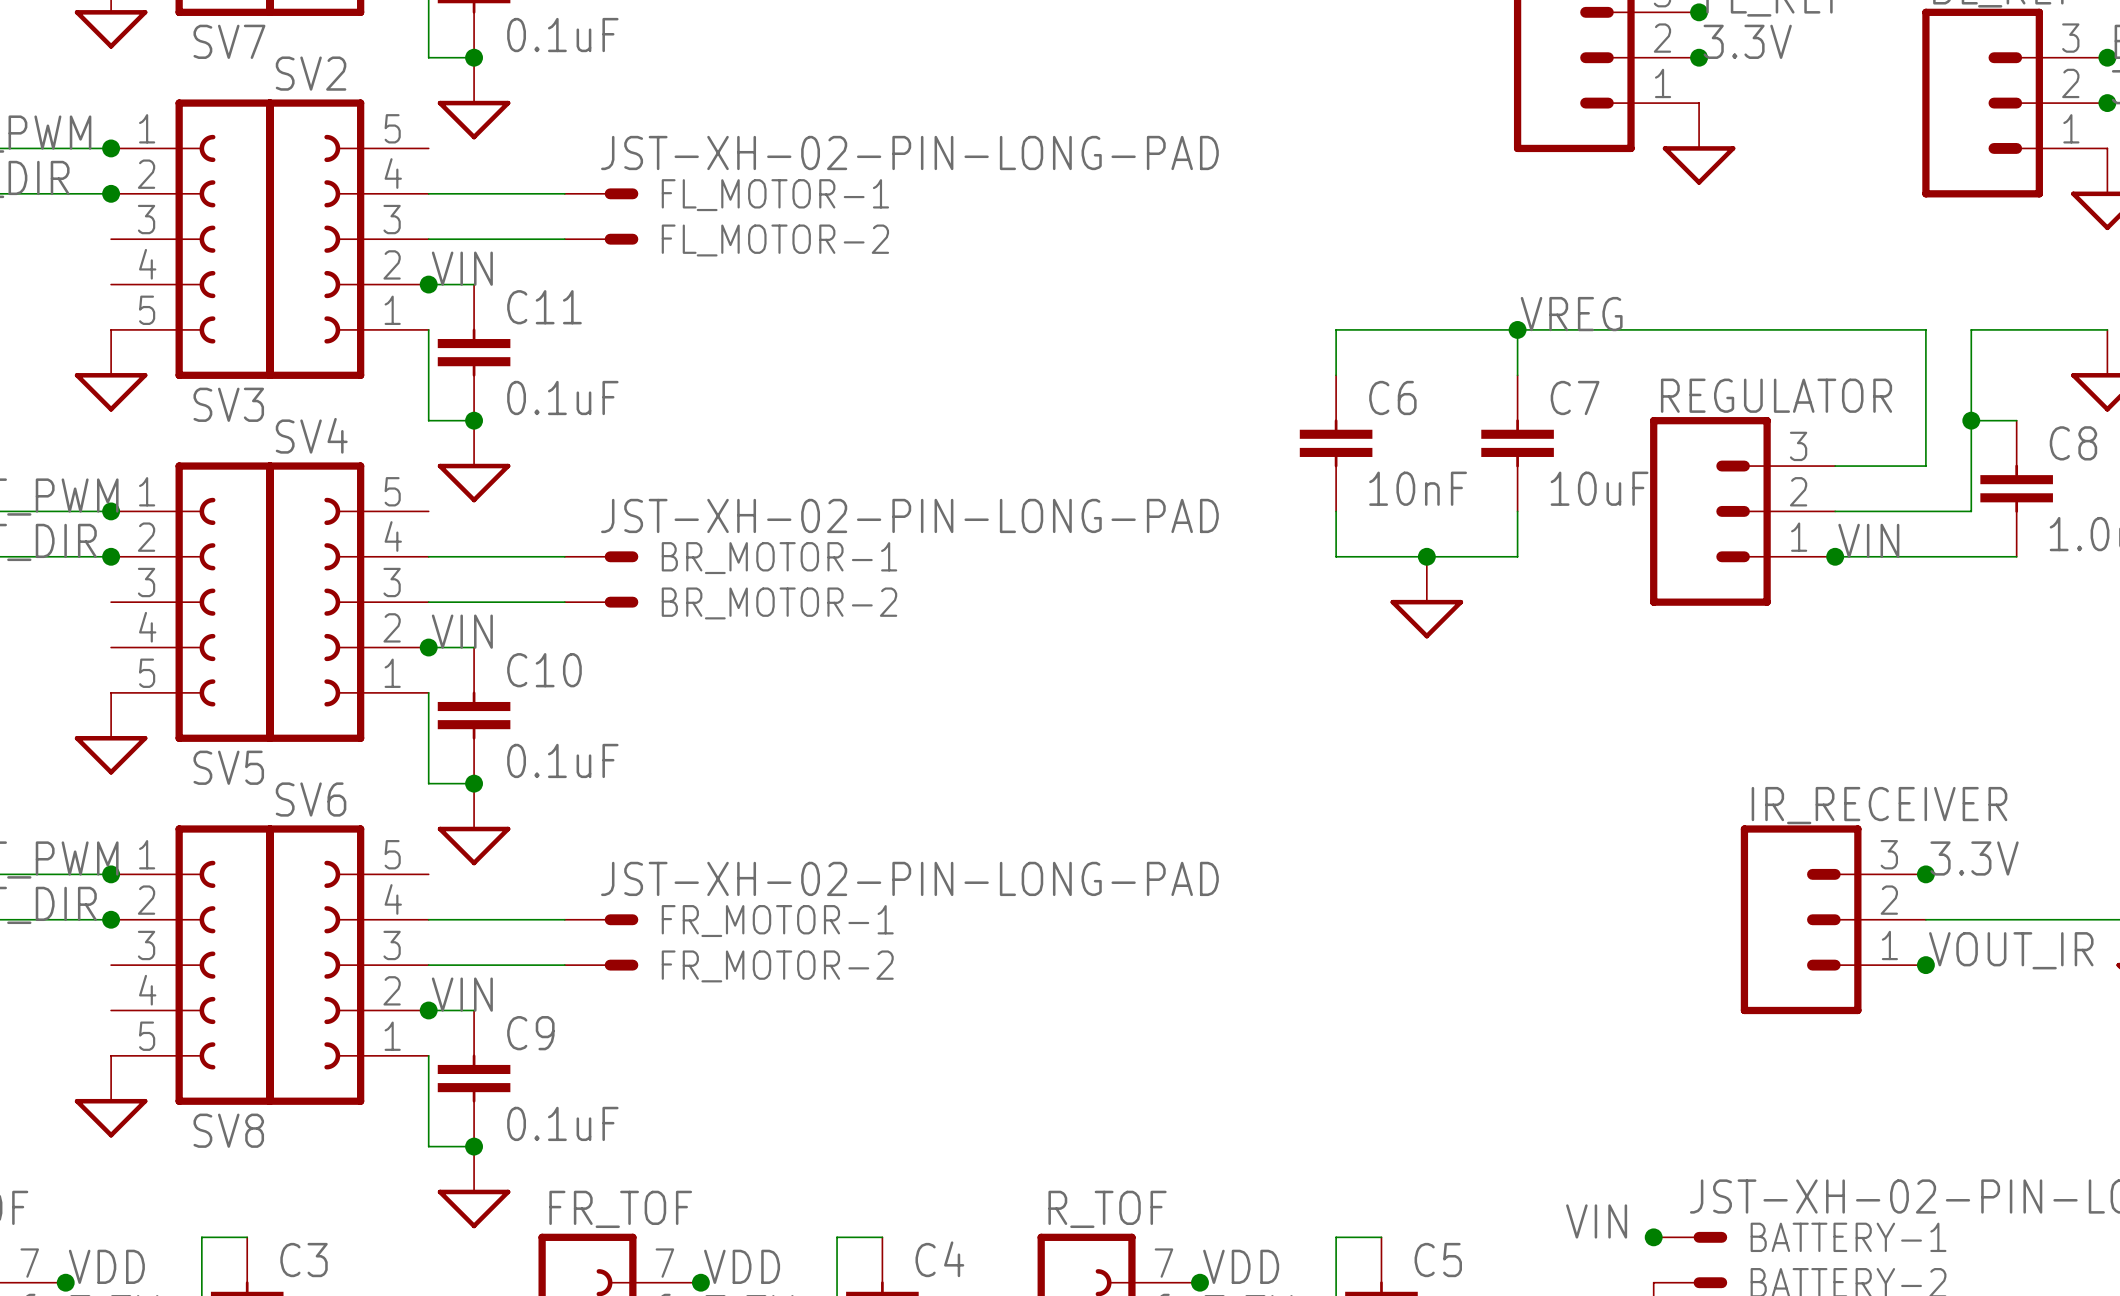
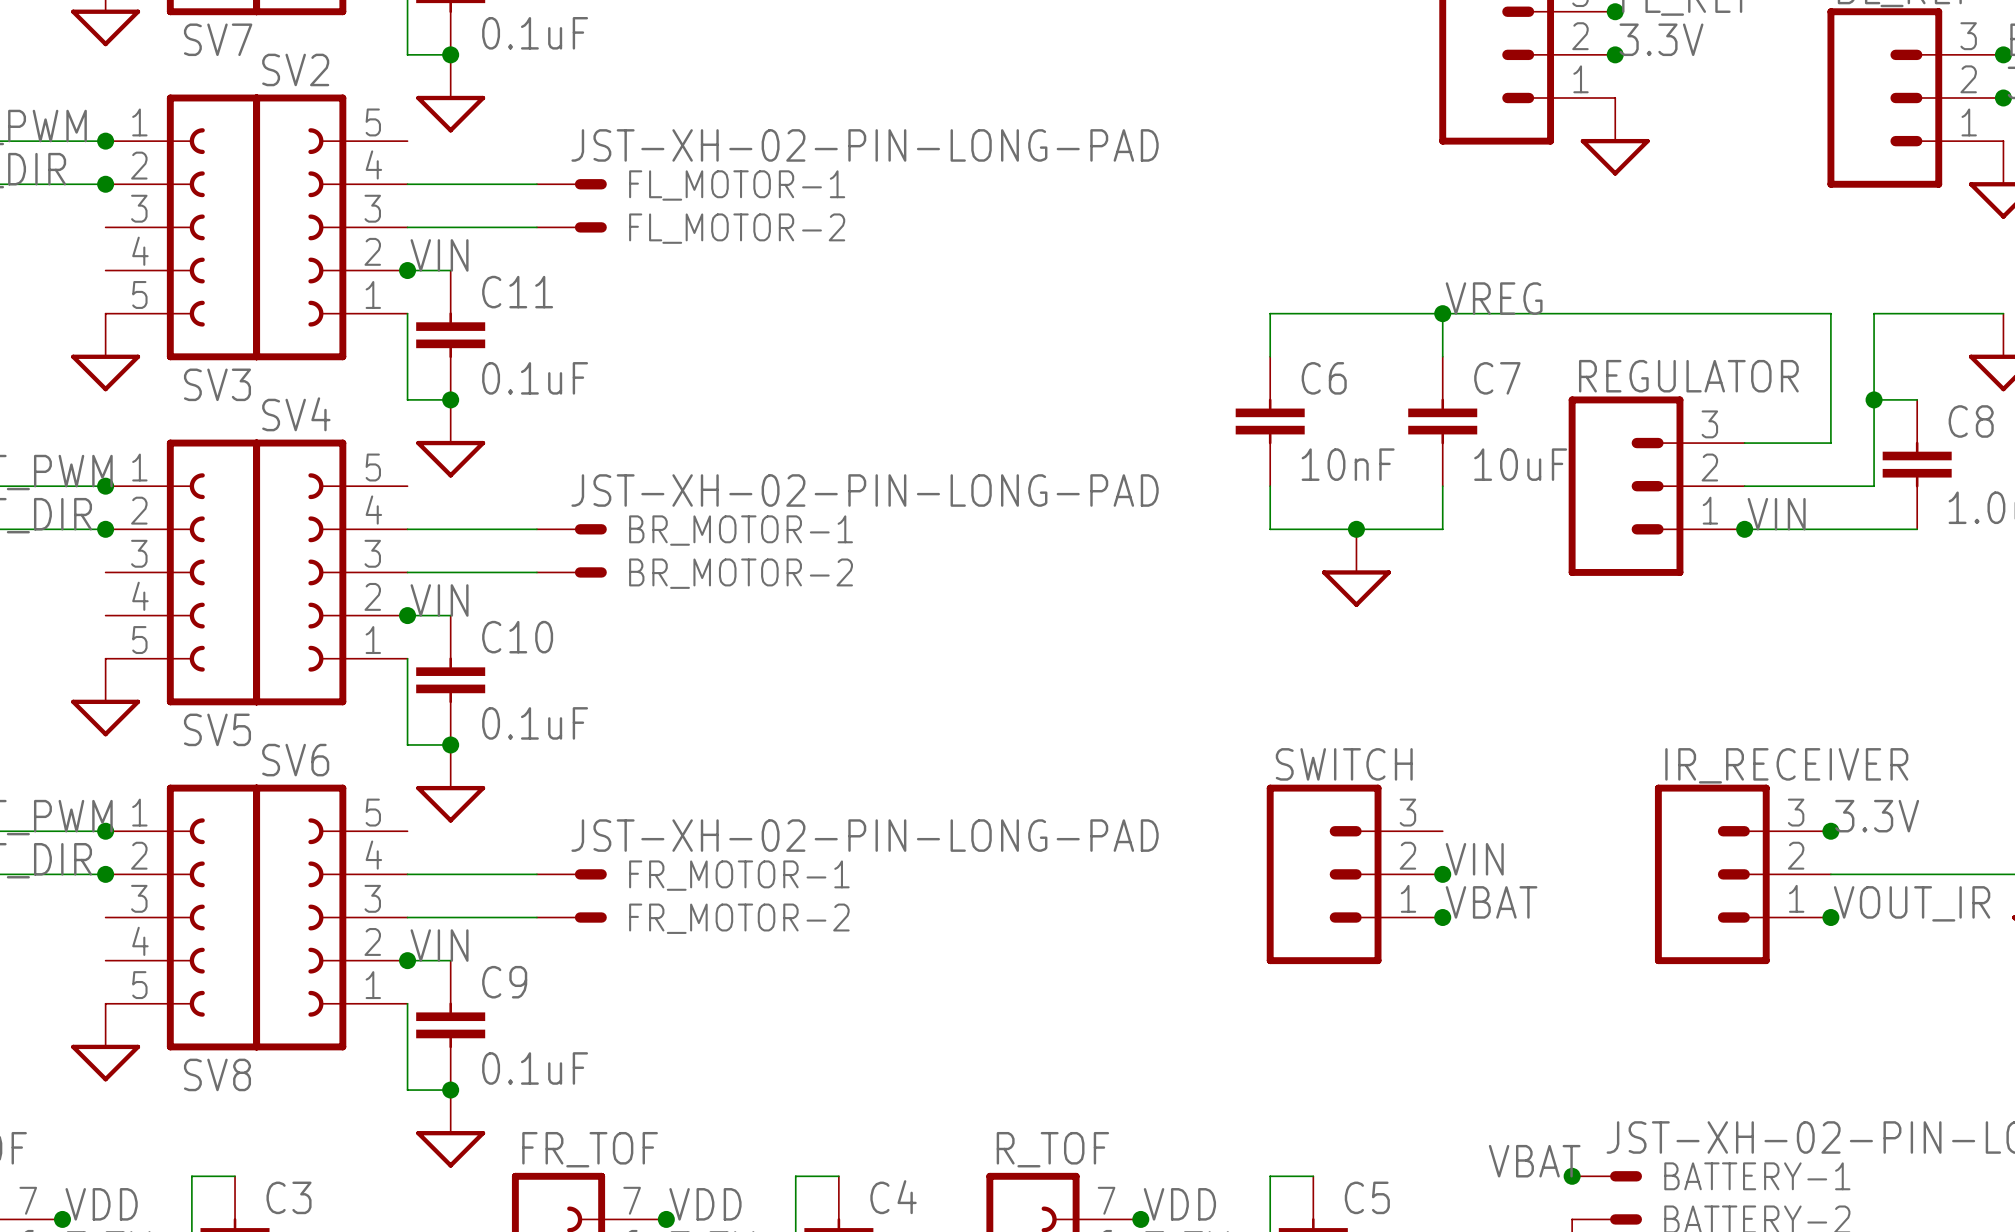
label: none -> VIN (1474, 859)
SWITCH: none -> (1354, 874)
junction: none -> (1442, 874)
label: none -> VBAT (1491, 902)
junction: none -> (1442, 917)
label: VIN (1596, 1221) -> VBAT (1534, 1161)

